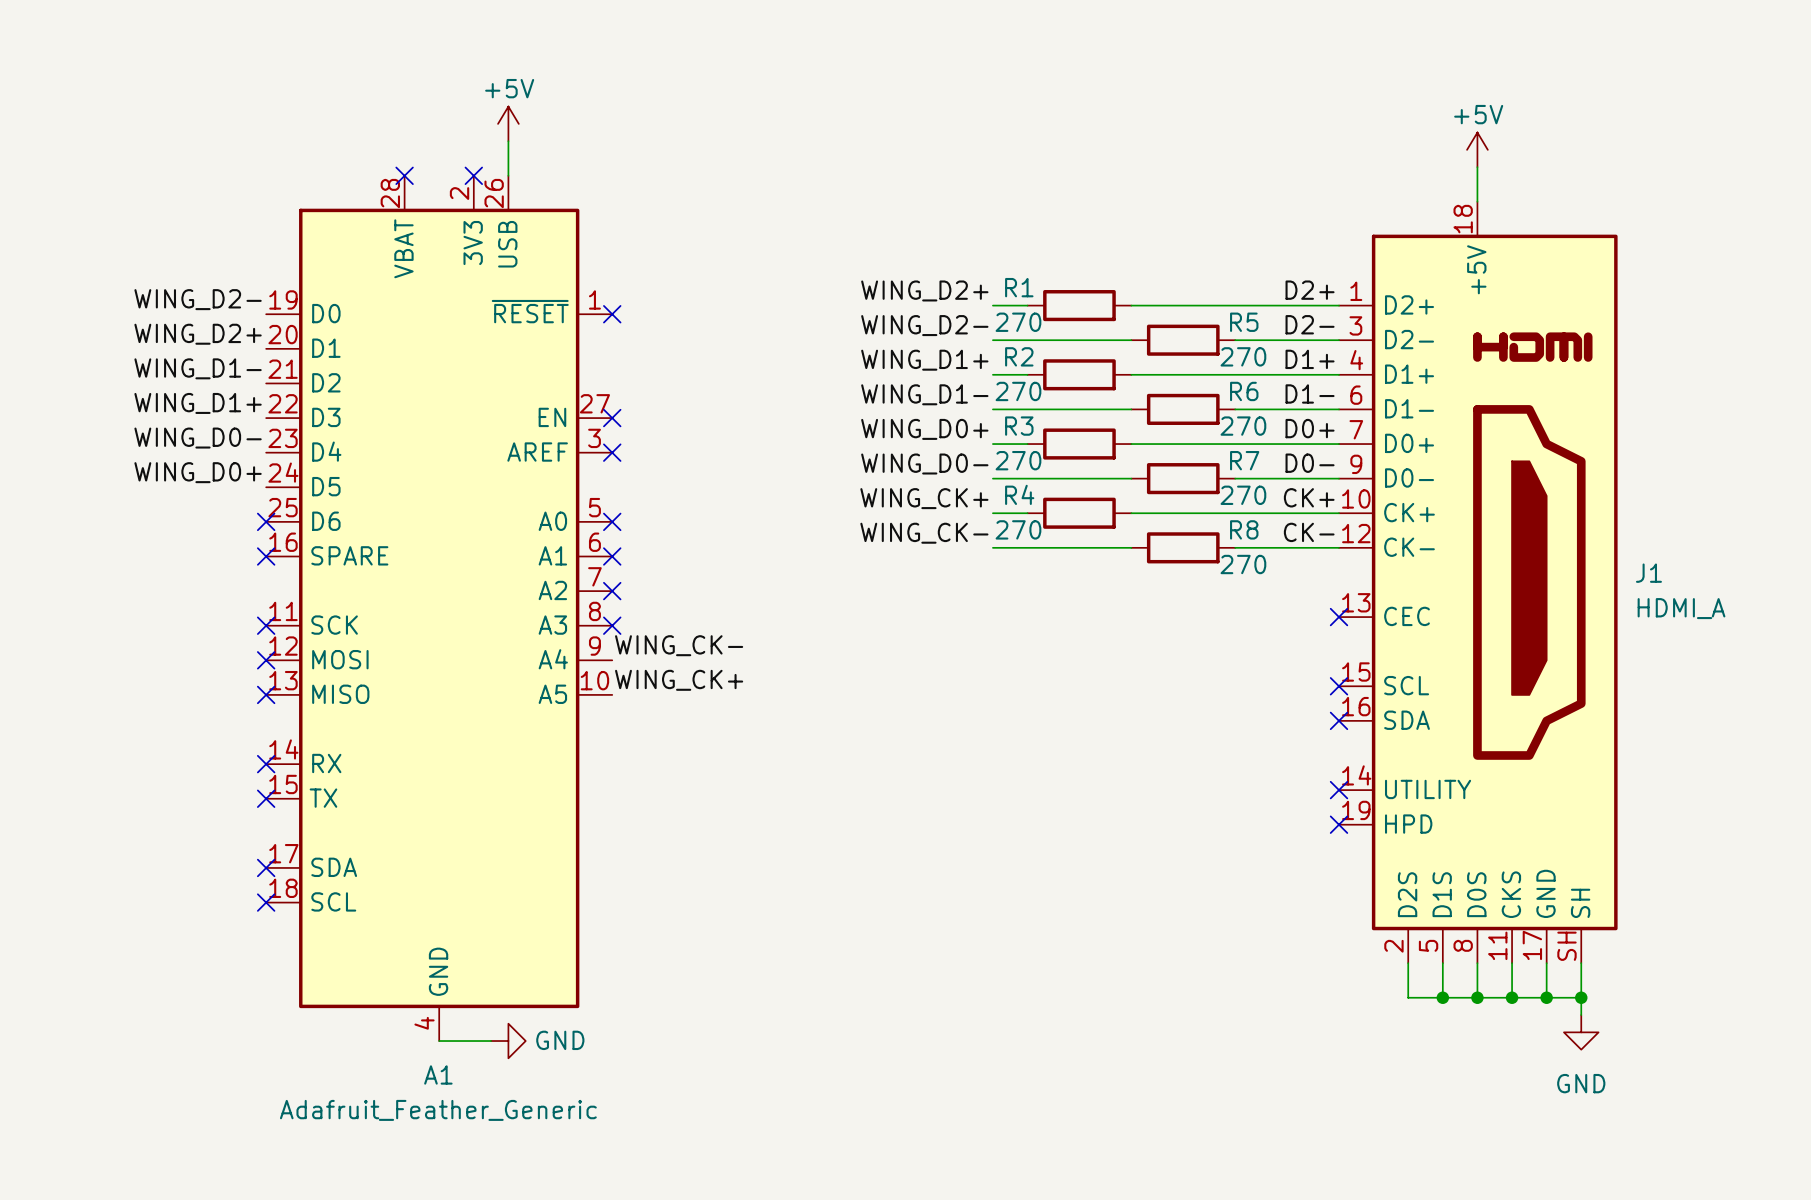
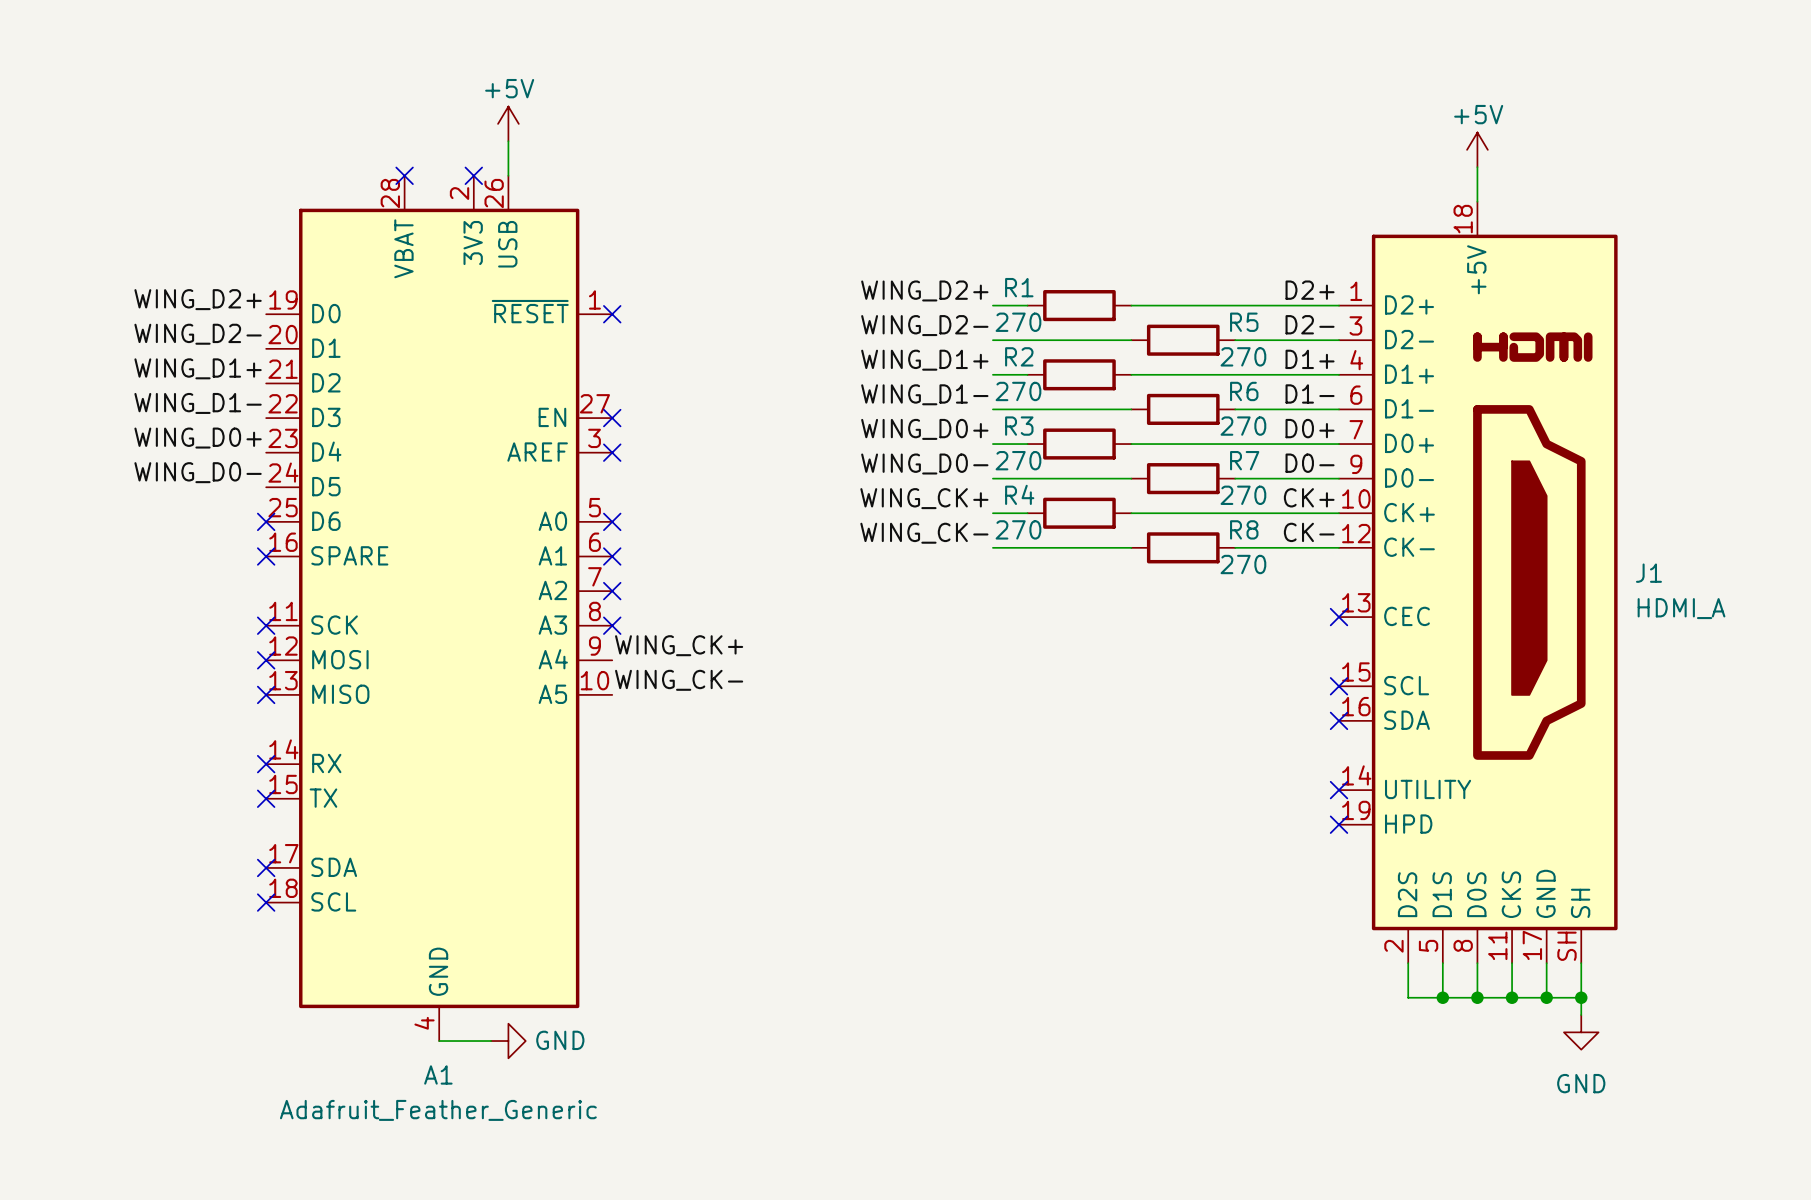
label: WING_D2- (198, 299) -> WING_D2+ (198, 299)
label: WING_D2+ (198, 334) -> WING_D2- (198, 334)
label: WING_D1- (198, 368) -> WING_D1+ (198, 368)
label: WING_D1+ (198, 403) -> WING_D1- (198, 403)
label: WING_D0- (198, 438) -> WING_D0+ (198, 438)
label: WING_D0+ (198, 472) -> WING_D0- (198, 472)
label: WING_CK- (679, 645) -> WING_CK+ (679, 645)
label: WING_CK+ (679, 680) -> WING_CK- (679, 680)

